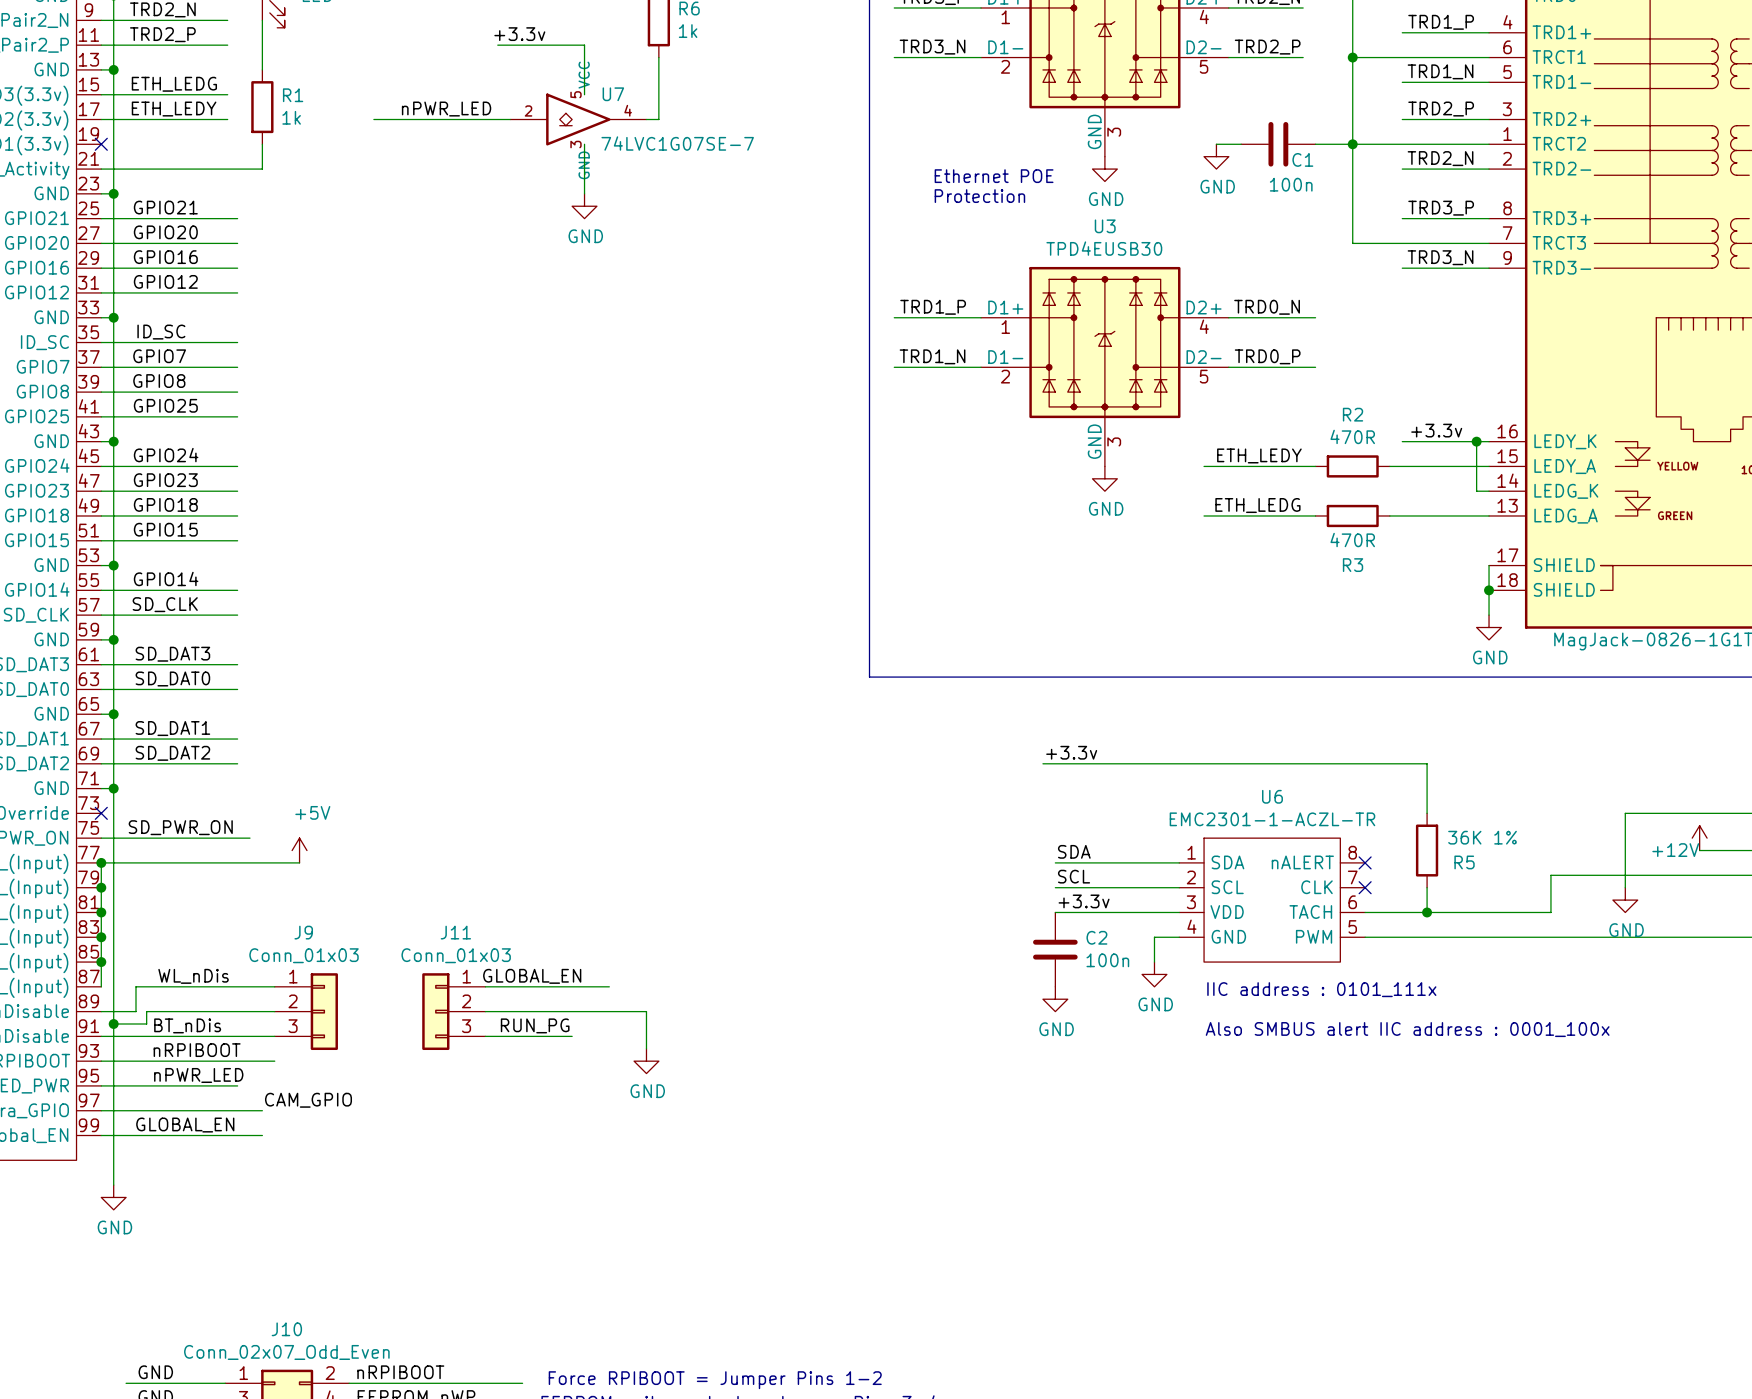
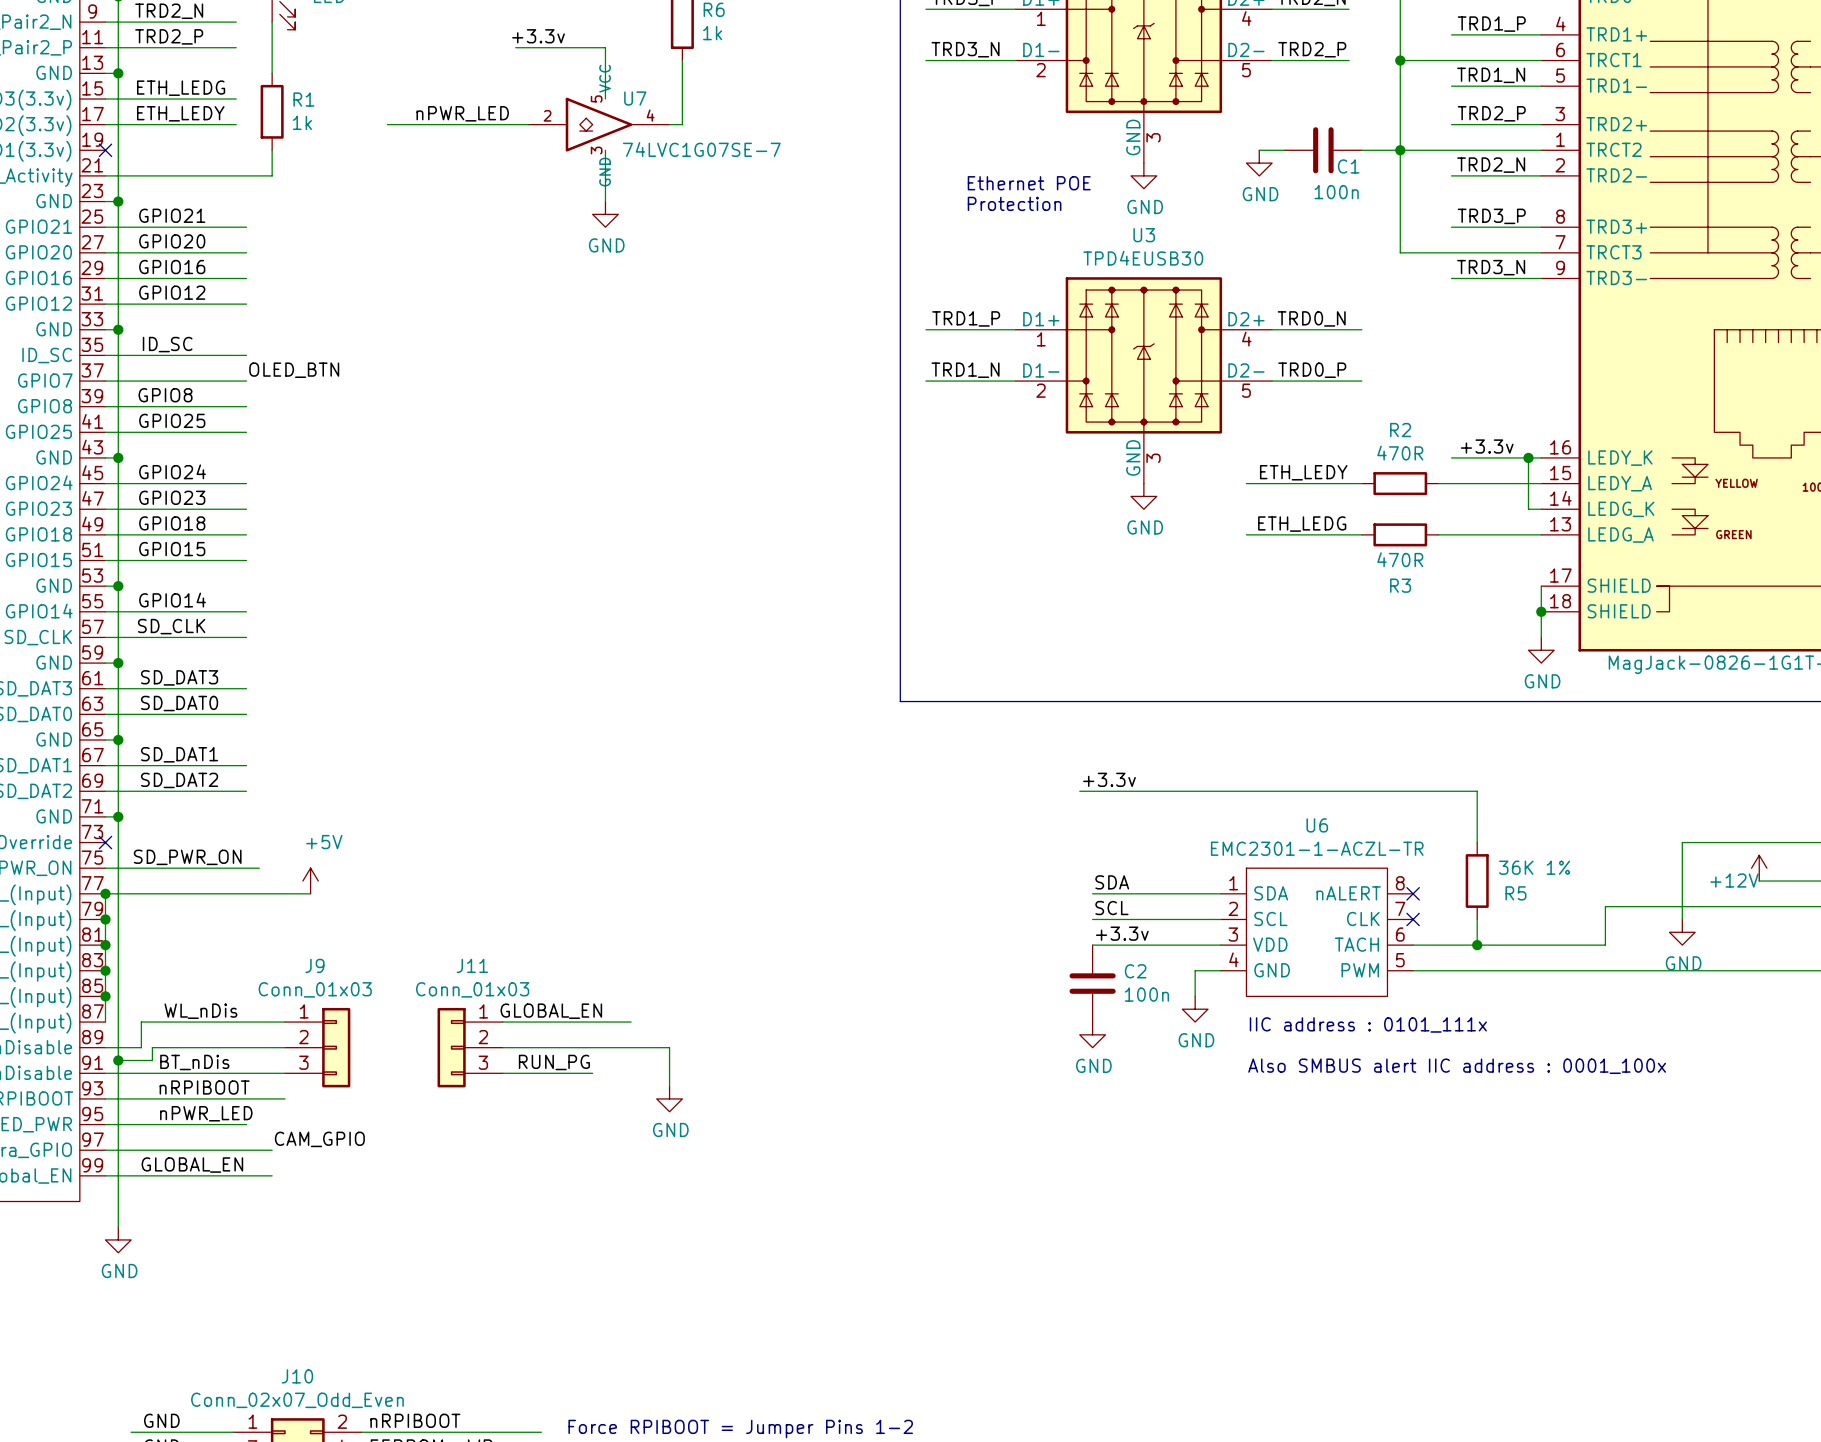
label: GPIO7 (159, 356) -> none
label: none -> OLED_BTN (294, 370)

